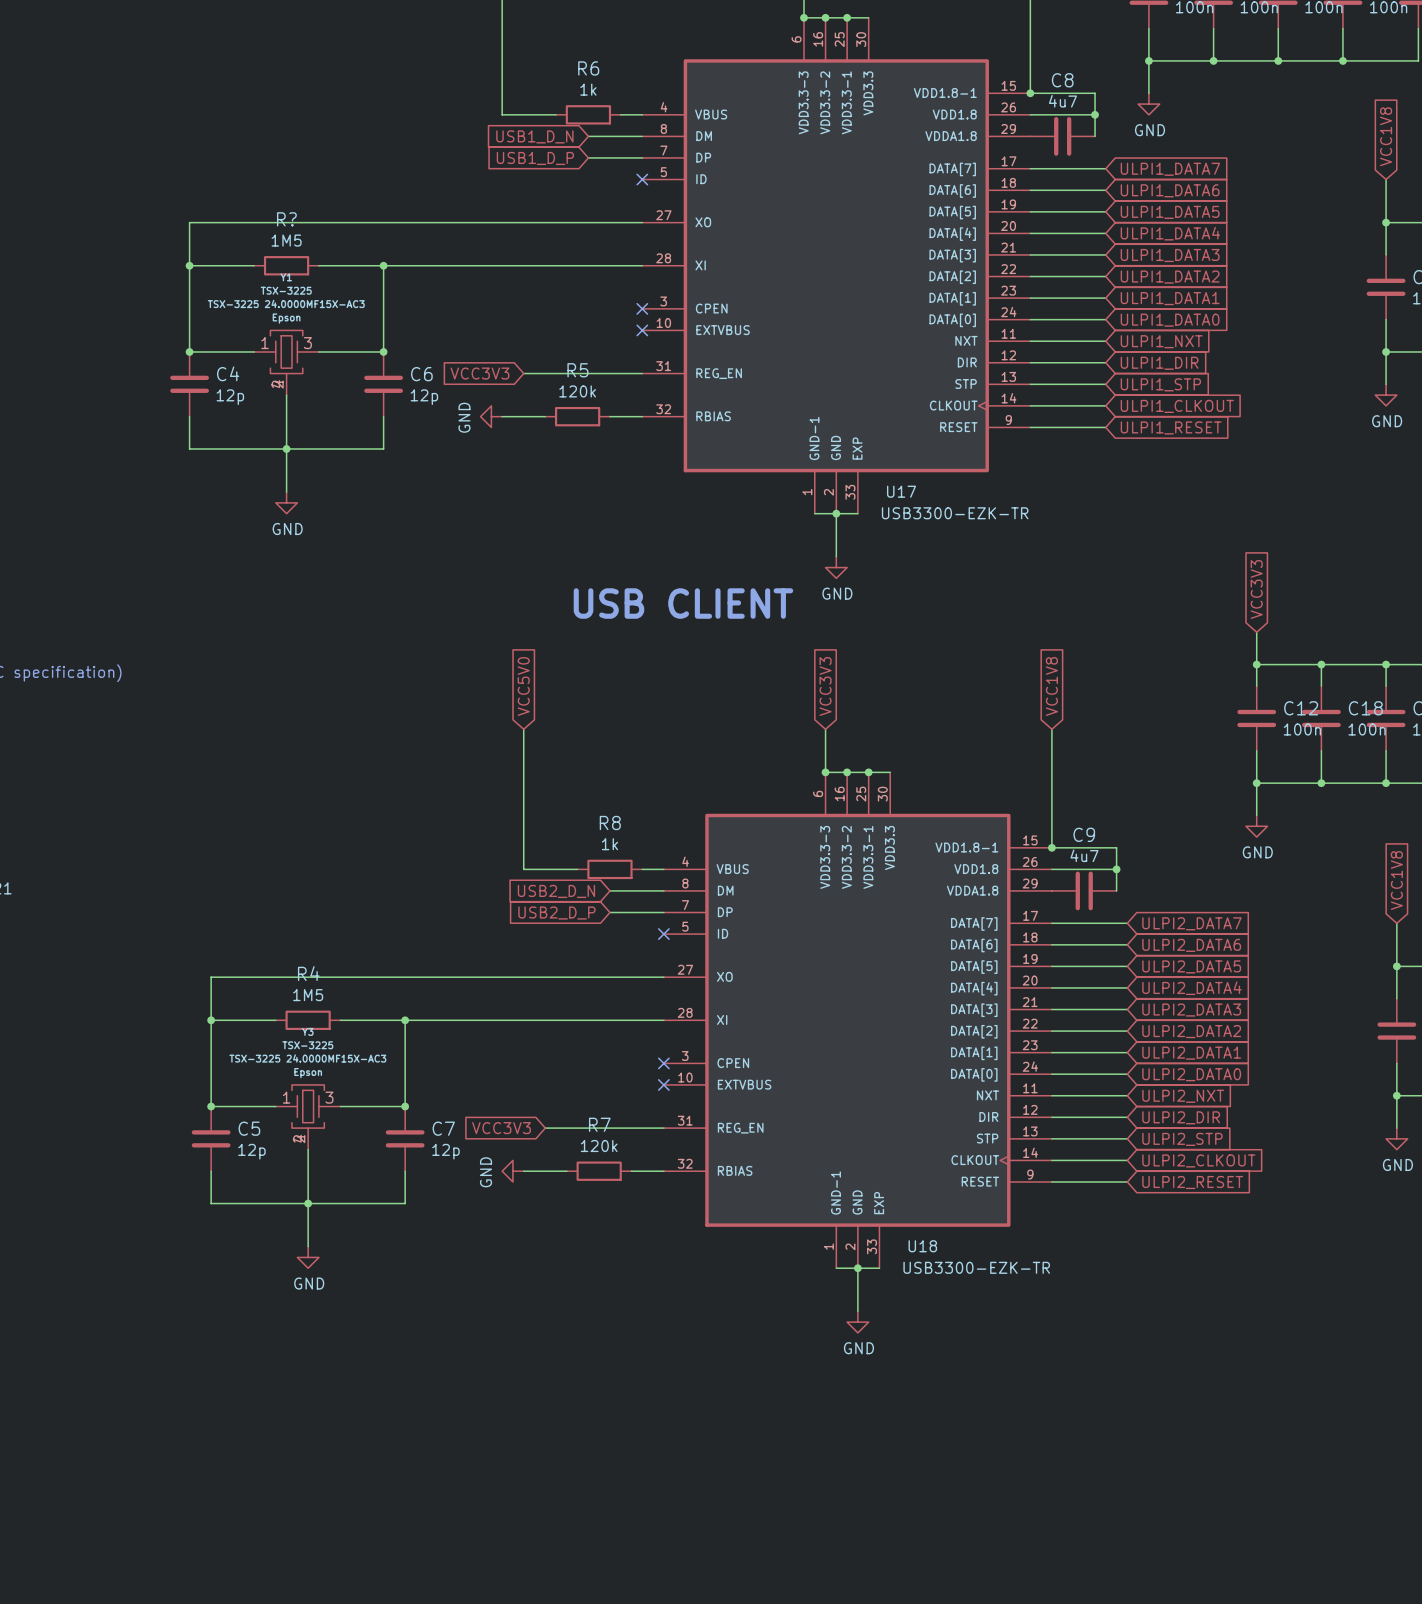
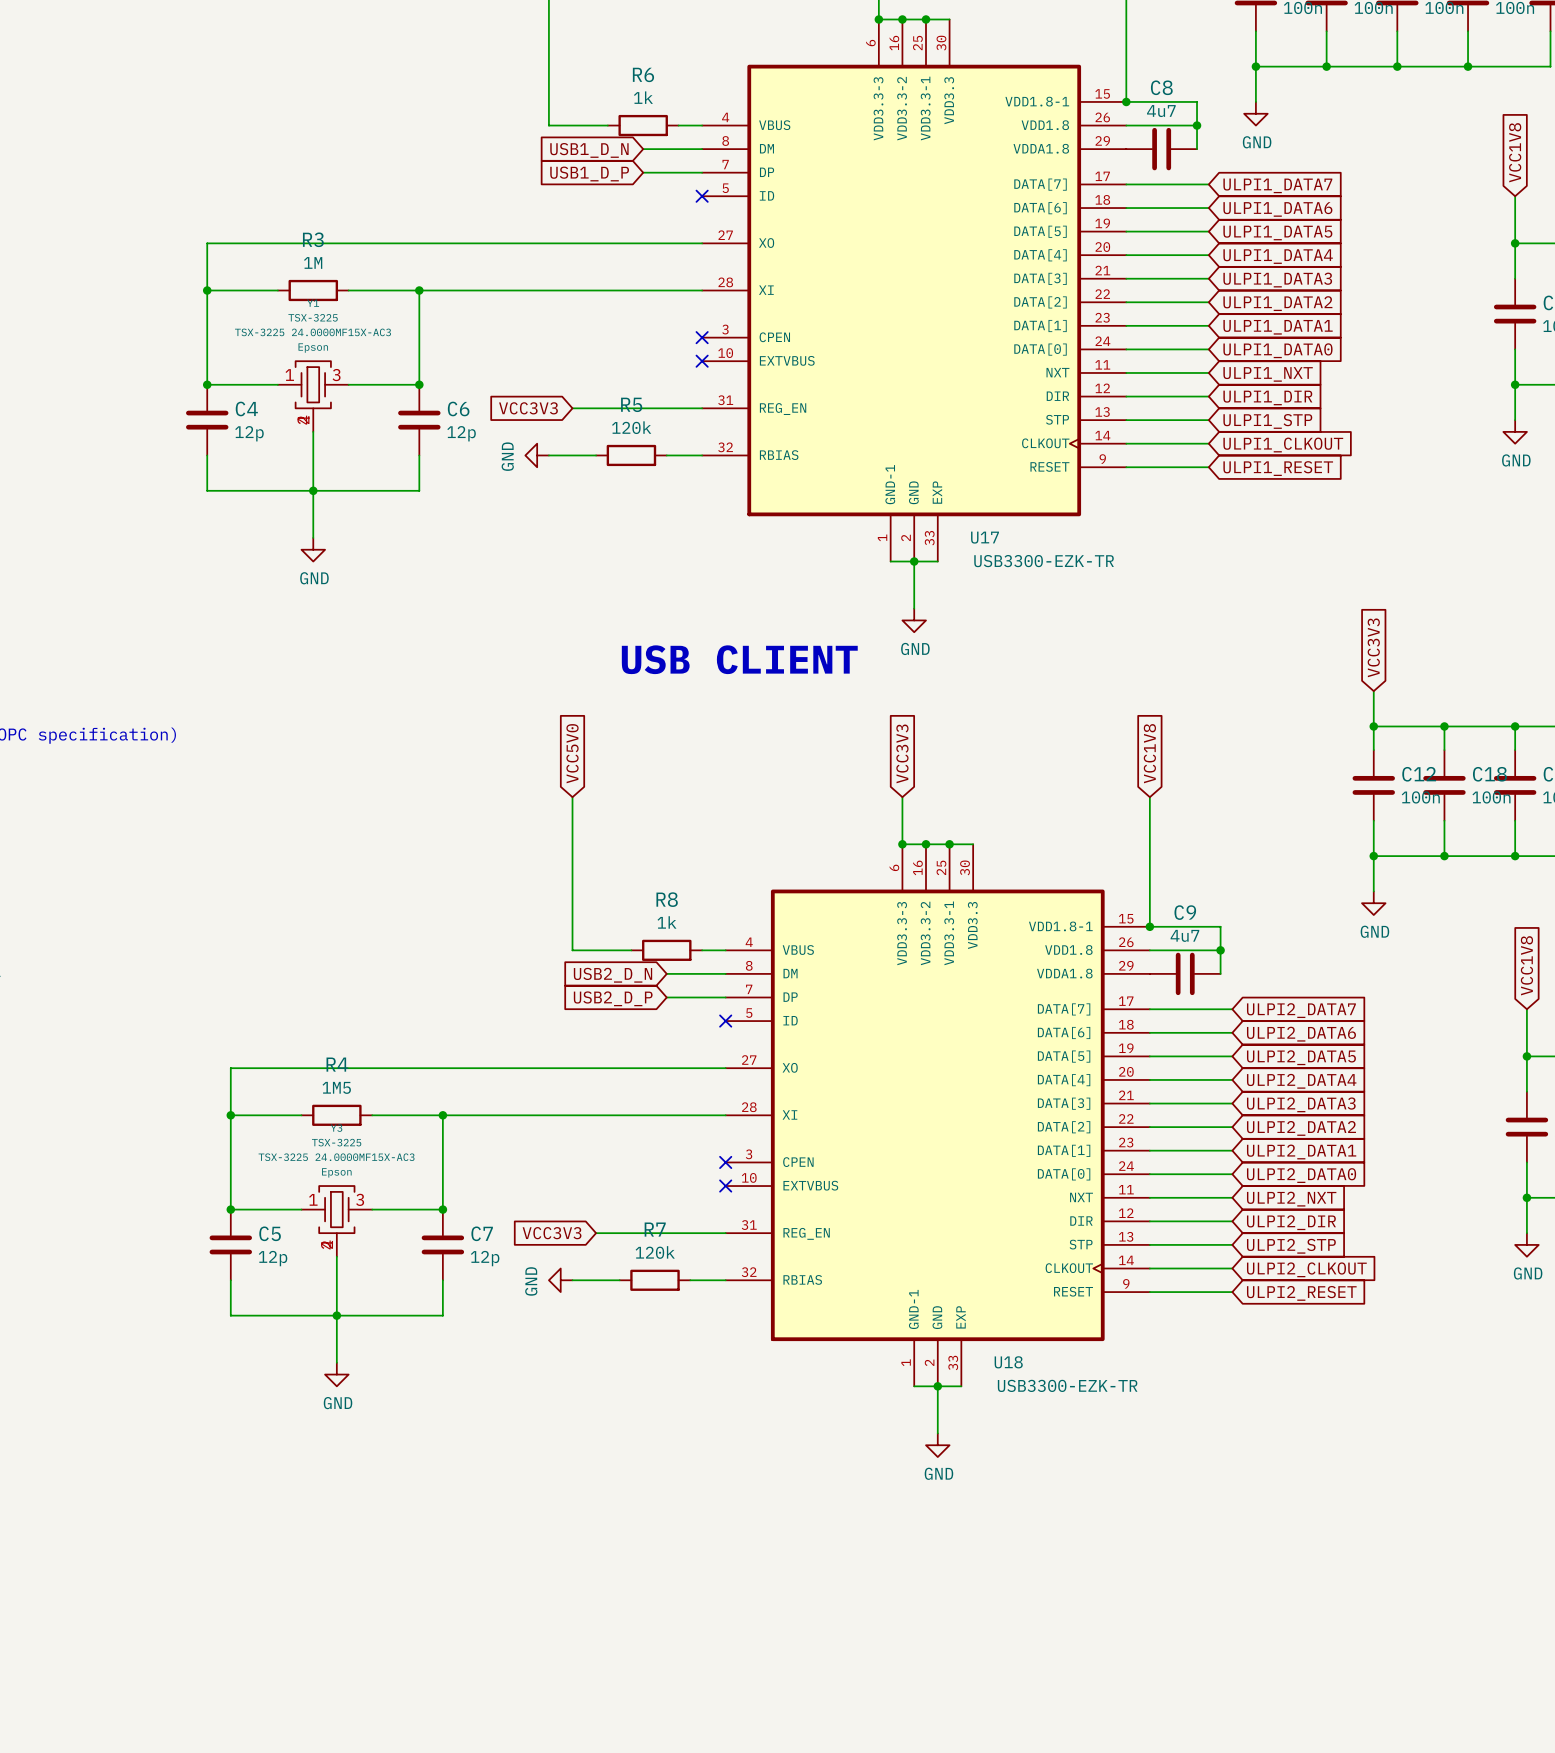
R? name: R? (286, 219) -> R3 (313, 239)
R? text: 1M5 (286, 240) -> 1M (313, 262)

